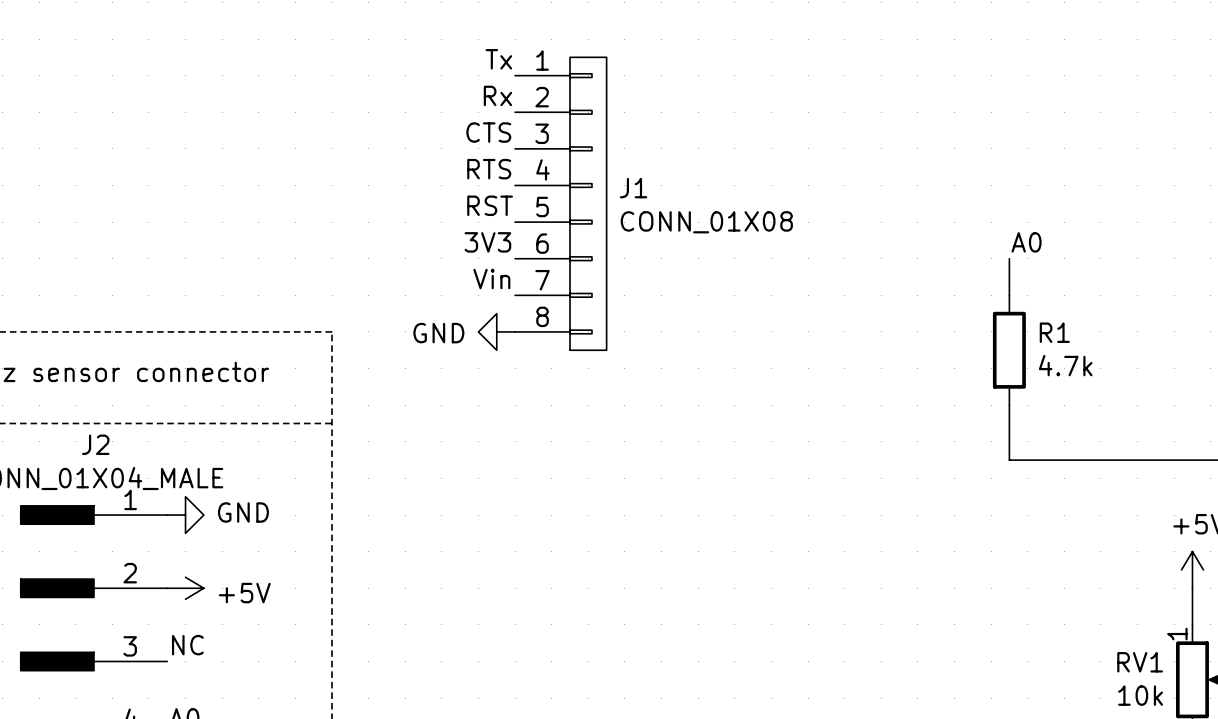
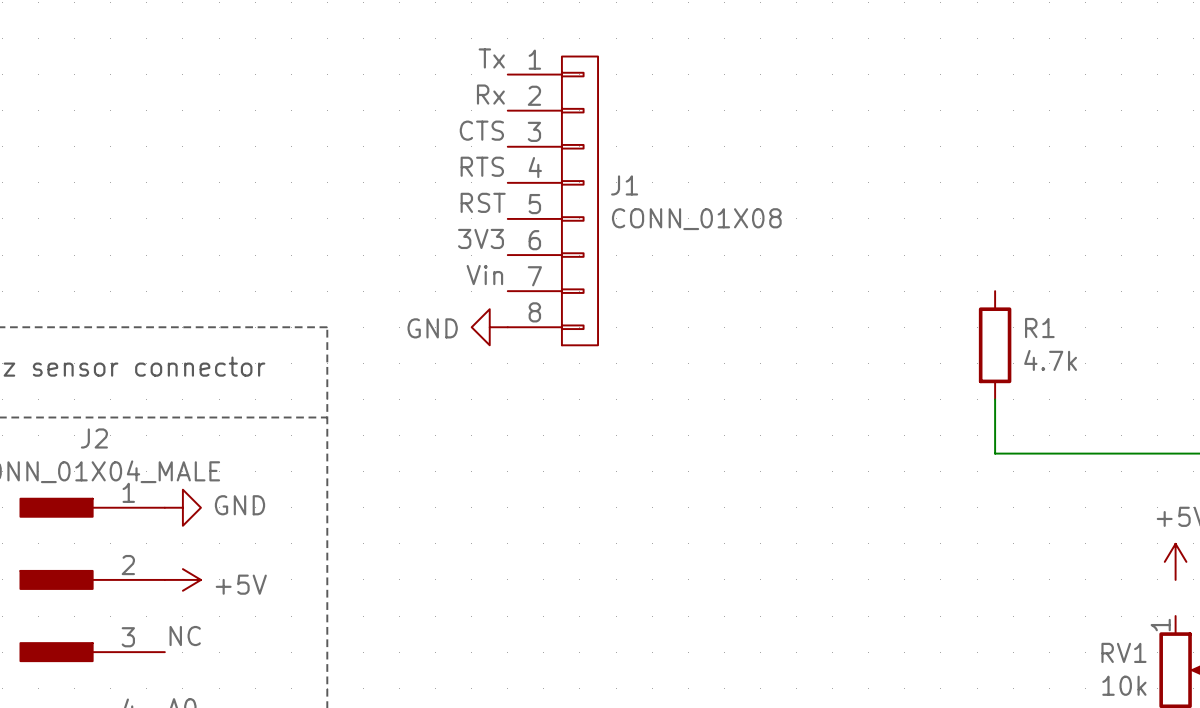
label: A0 (1026, 242) -> none
wire: (1009, 258) (1009, 295) -> none
wire: (1192, 588) (1192, 624) -> none

